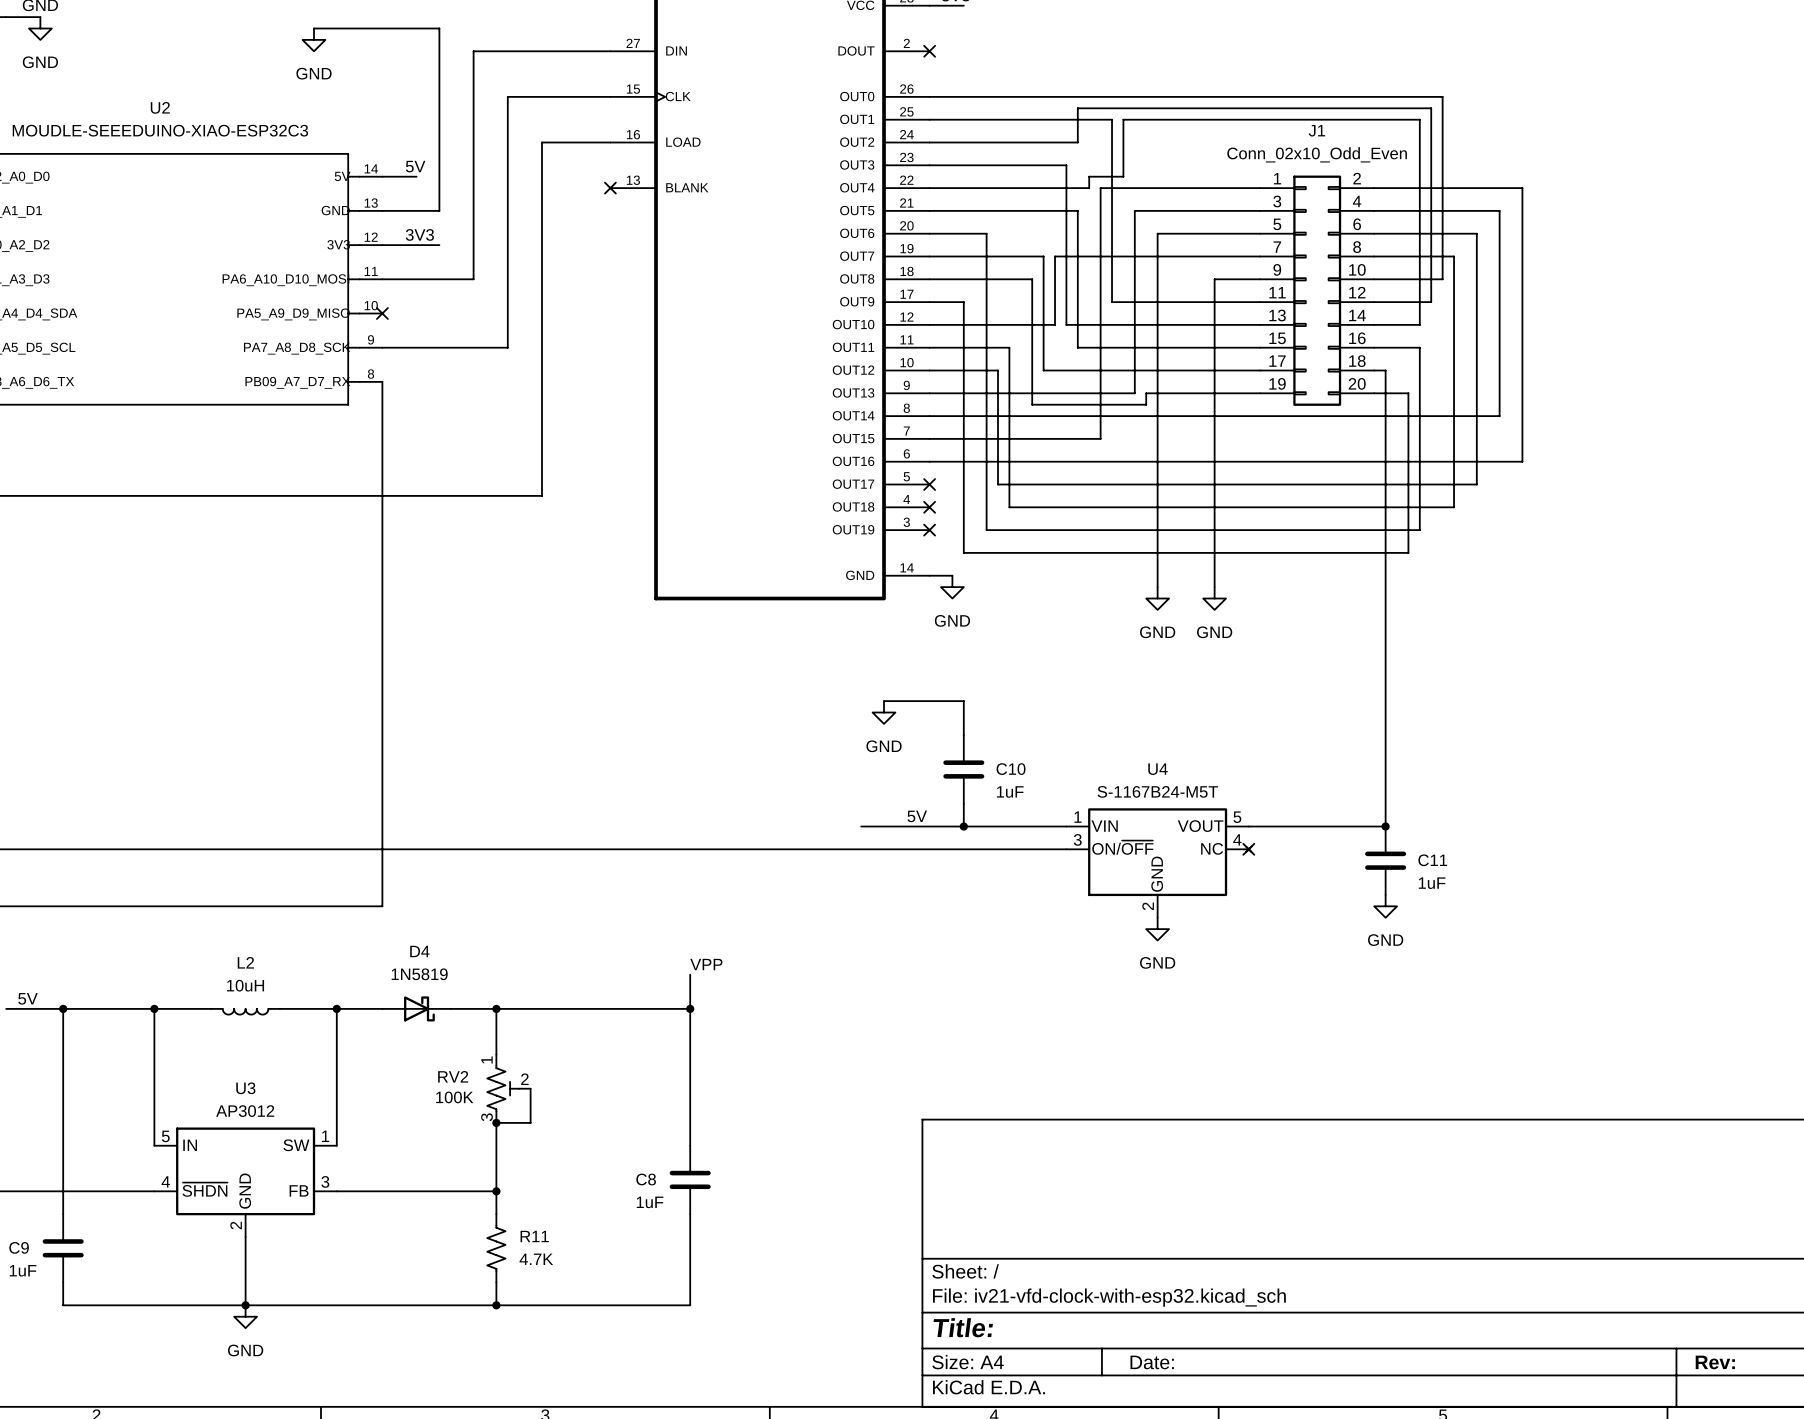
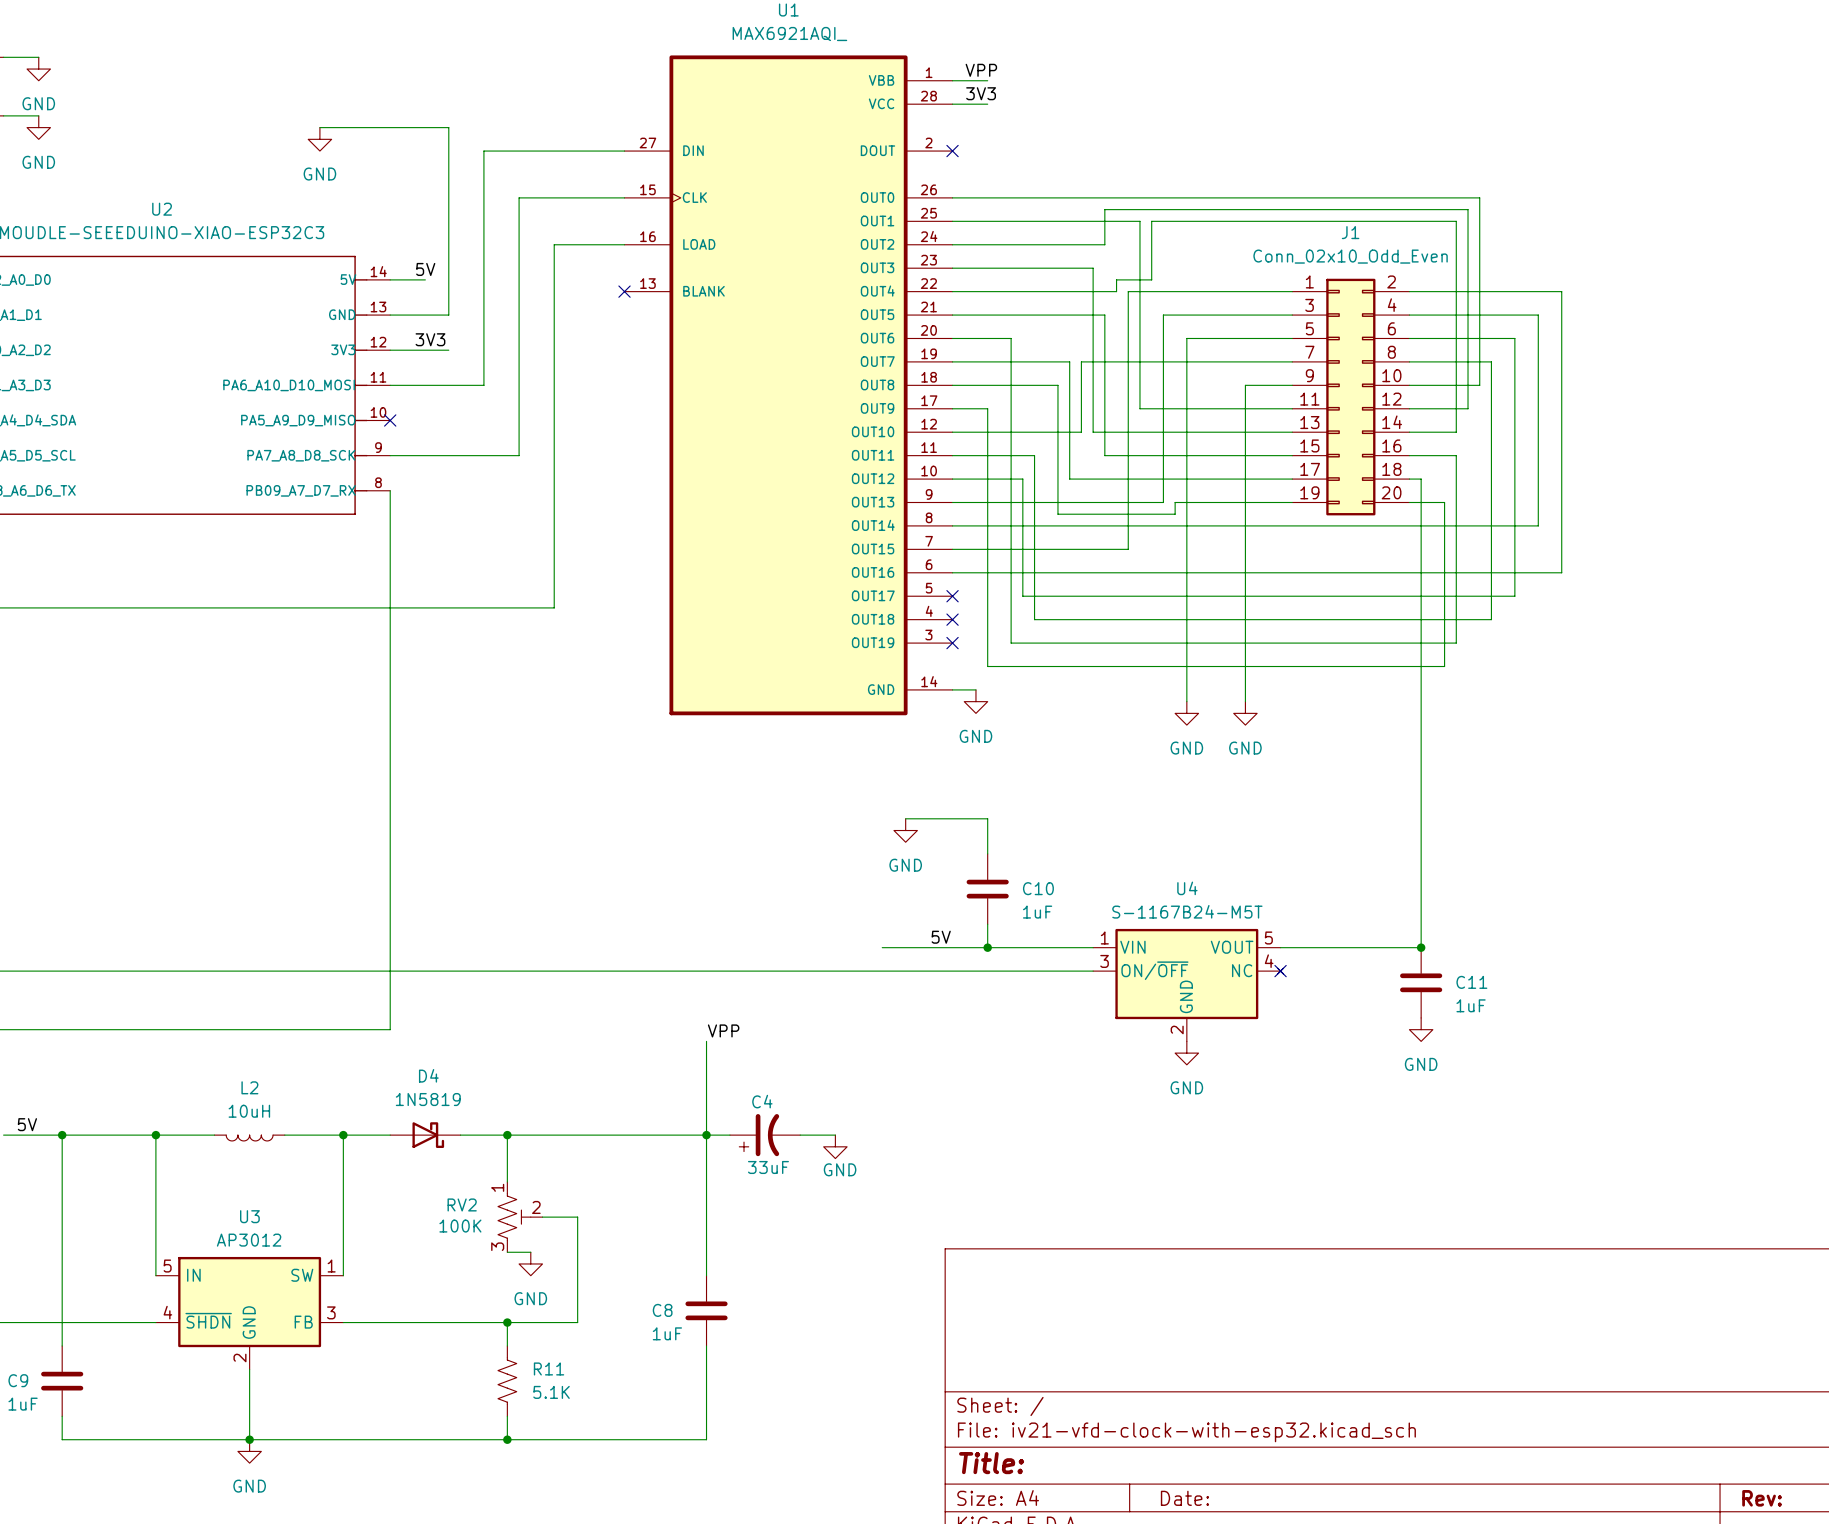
wire: none -> (706, 1041) (706, 1099)
label position: VPP (706, 964) -> VPP (723, 1030)
wire: none -> (706, 1135) (729, 1135)
C4: none -> 33uF (765, 1135)
wire: none -> (800, 1135) (835, 1135)
power symbol: none -> GND (835, 1146)
wire: (530, 1088) (530, 1122) (519, 1122) -> none
wire: (496, 1122) (496, 1191) -> (542, 1217) (577, 1217) (577, 1322) (507, 1322)
junction: (496, 1122) -> none
power symbol: none -> GND (530, 1263)
R11 value: 4.7K (536, 1259) -> 5.1K (551, 1392)

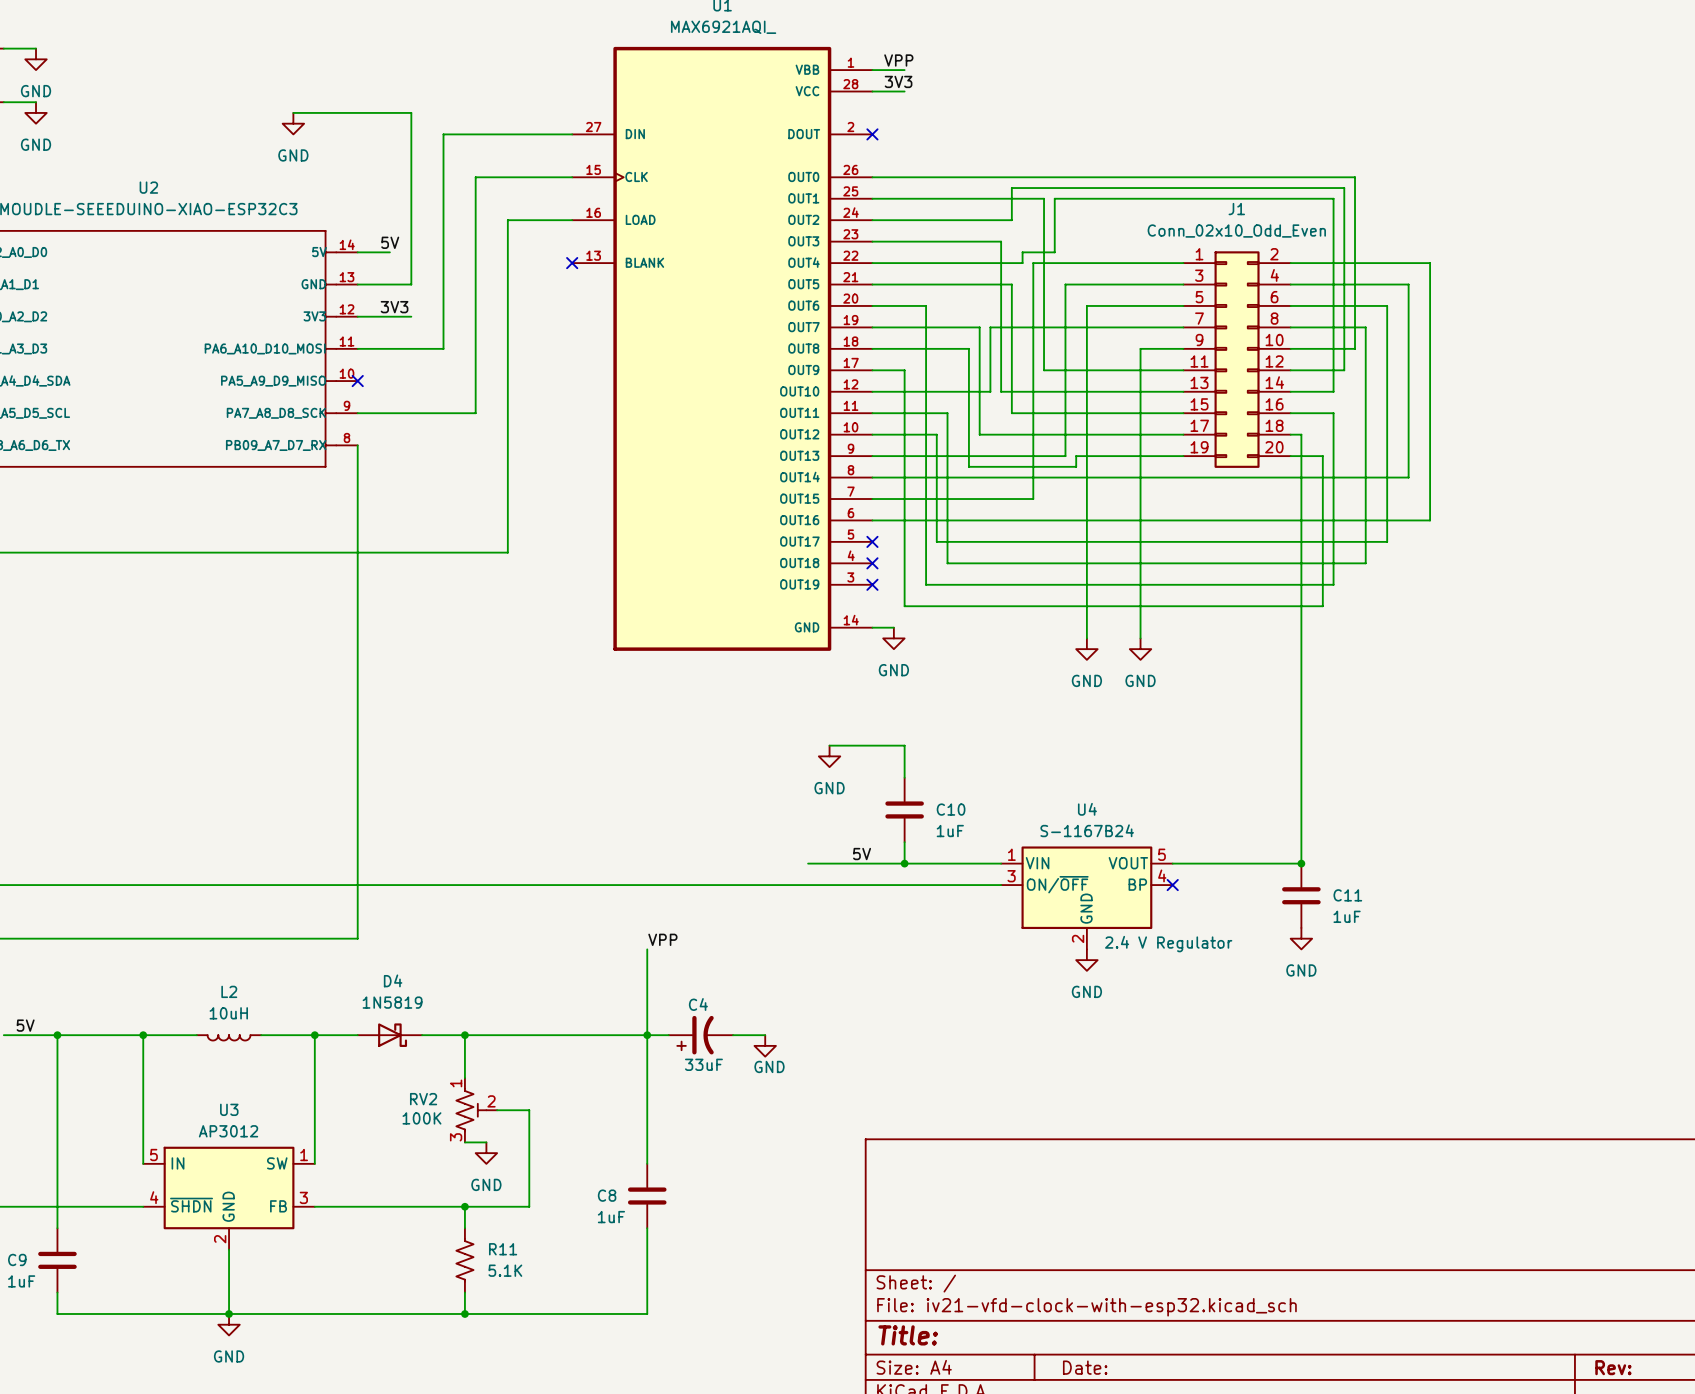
U4 value: S-1167B24-M5T (1187, 911) -> S-1167B24 (1087, 830)
U4 symbol: [1093, 928, 1284, 1042] -> [1001, 846, 1173, 950]
U4 text: none -> 2.4 V Regulator (1168, 944)

